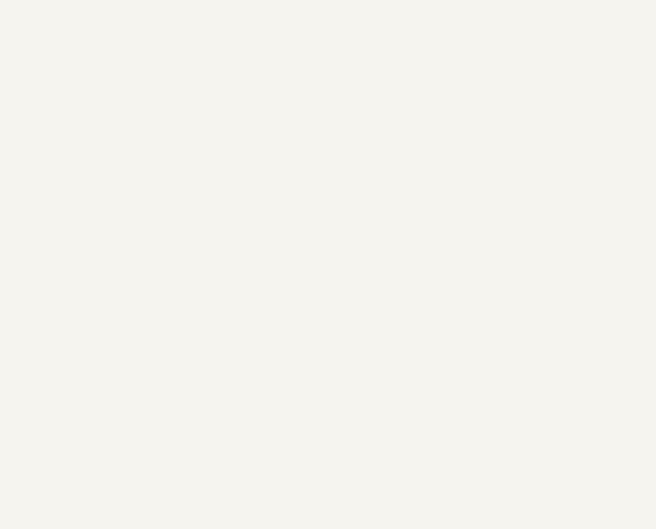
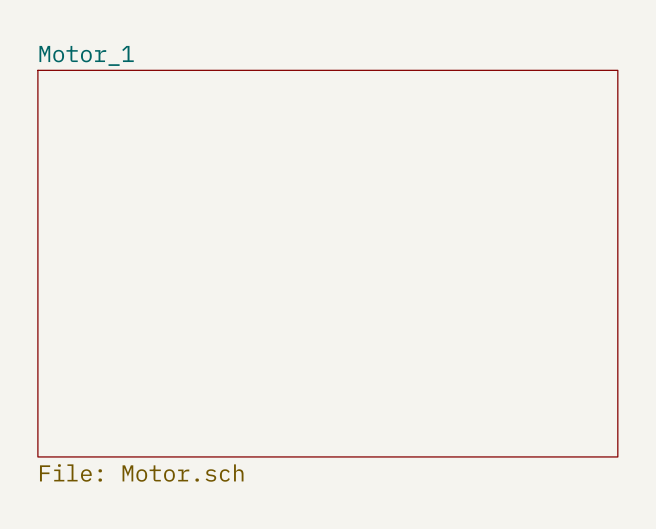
sheet Motor_1: none -> File: Motor.sch (327, 263)

